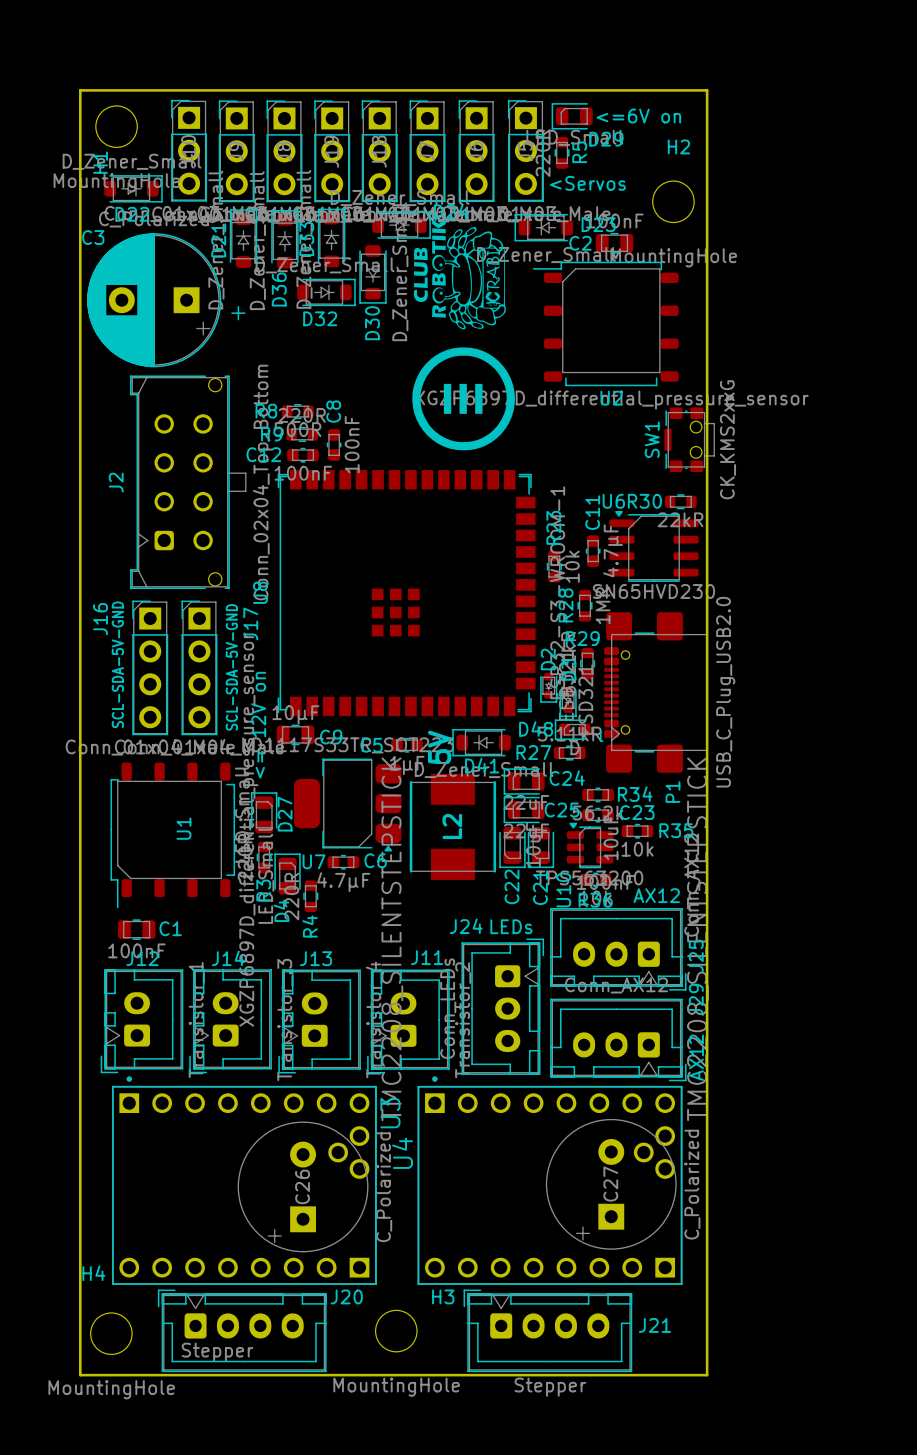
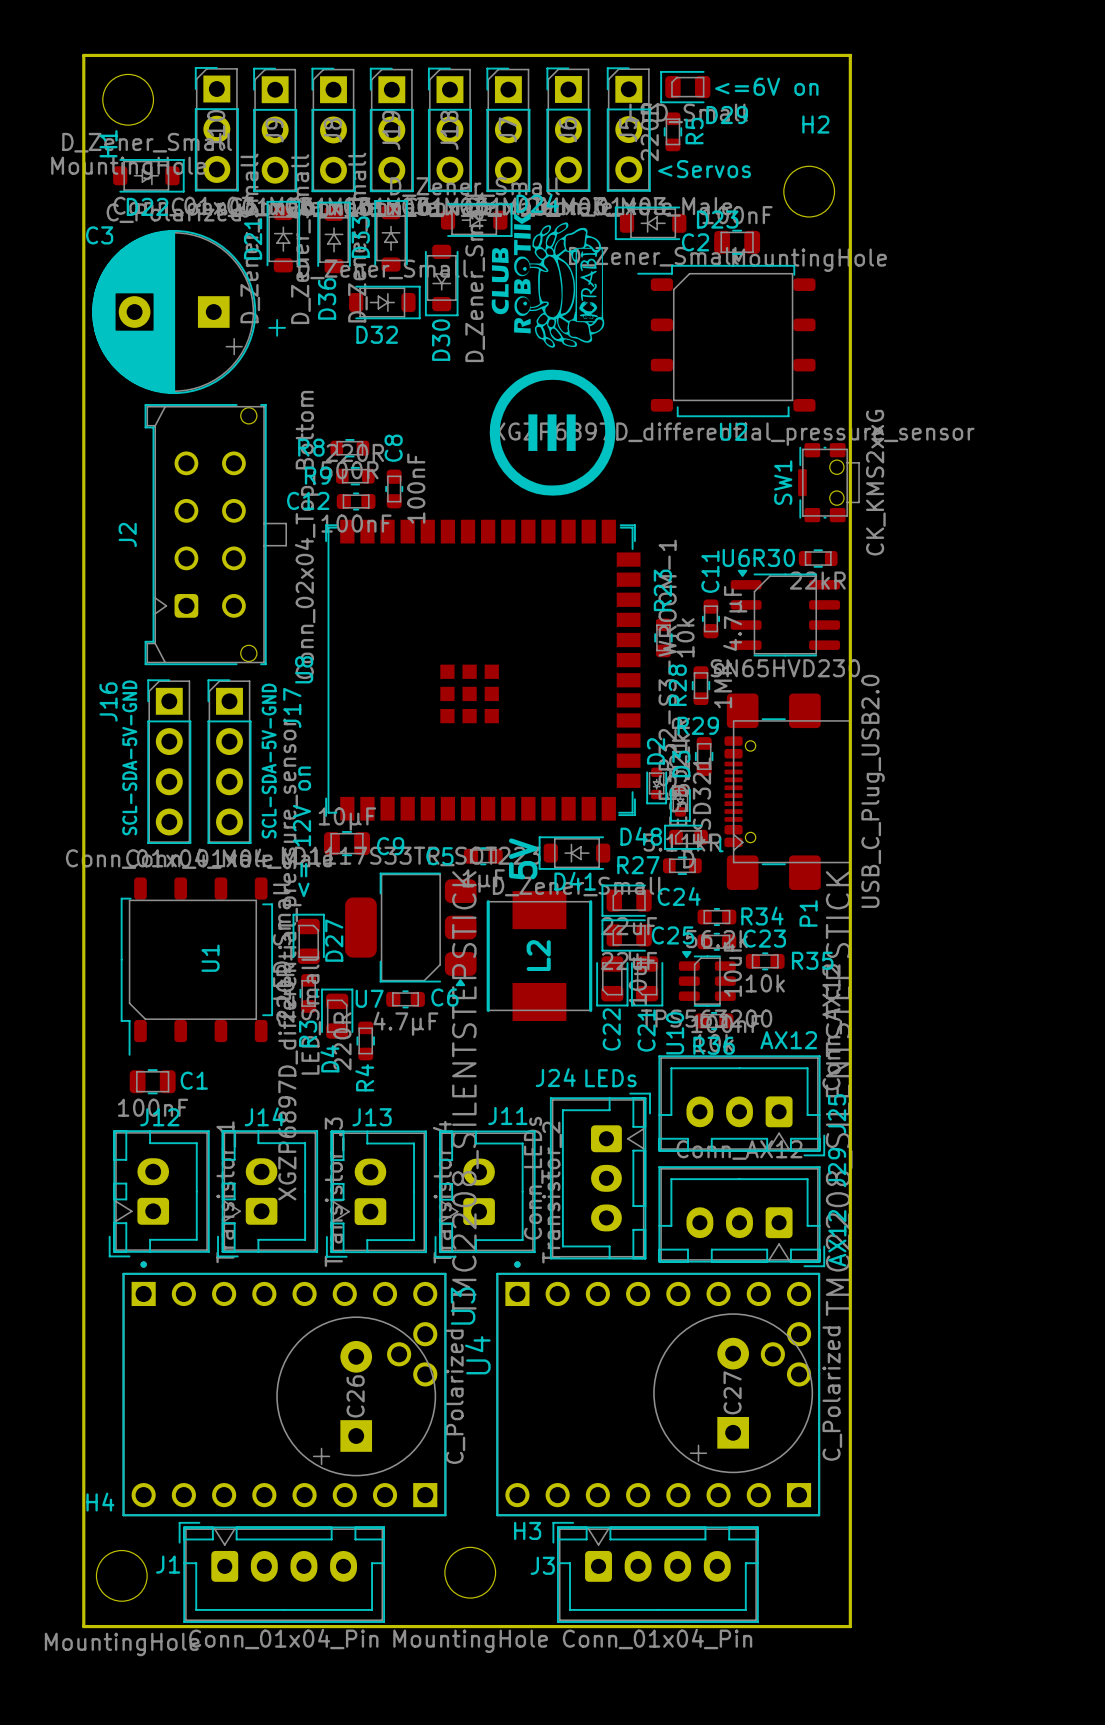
J20 name: J20 (346, 1296) -> J1 (168, 1564)
J21 name: J21 (655, 1325) -> J3 (542, 1565)
J20 value: Stepper (217, 1352) -> Conn_01x04_Pin (283, 1639)
J21 value: Stepper (550, 1387) -> Conn_01x04_Pin (657, 1639)

